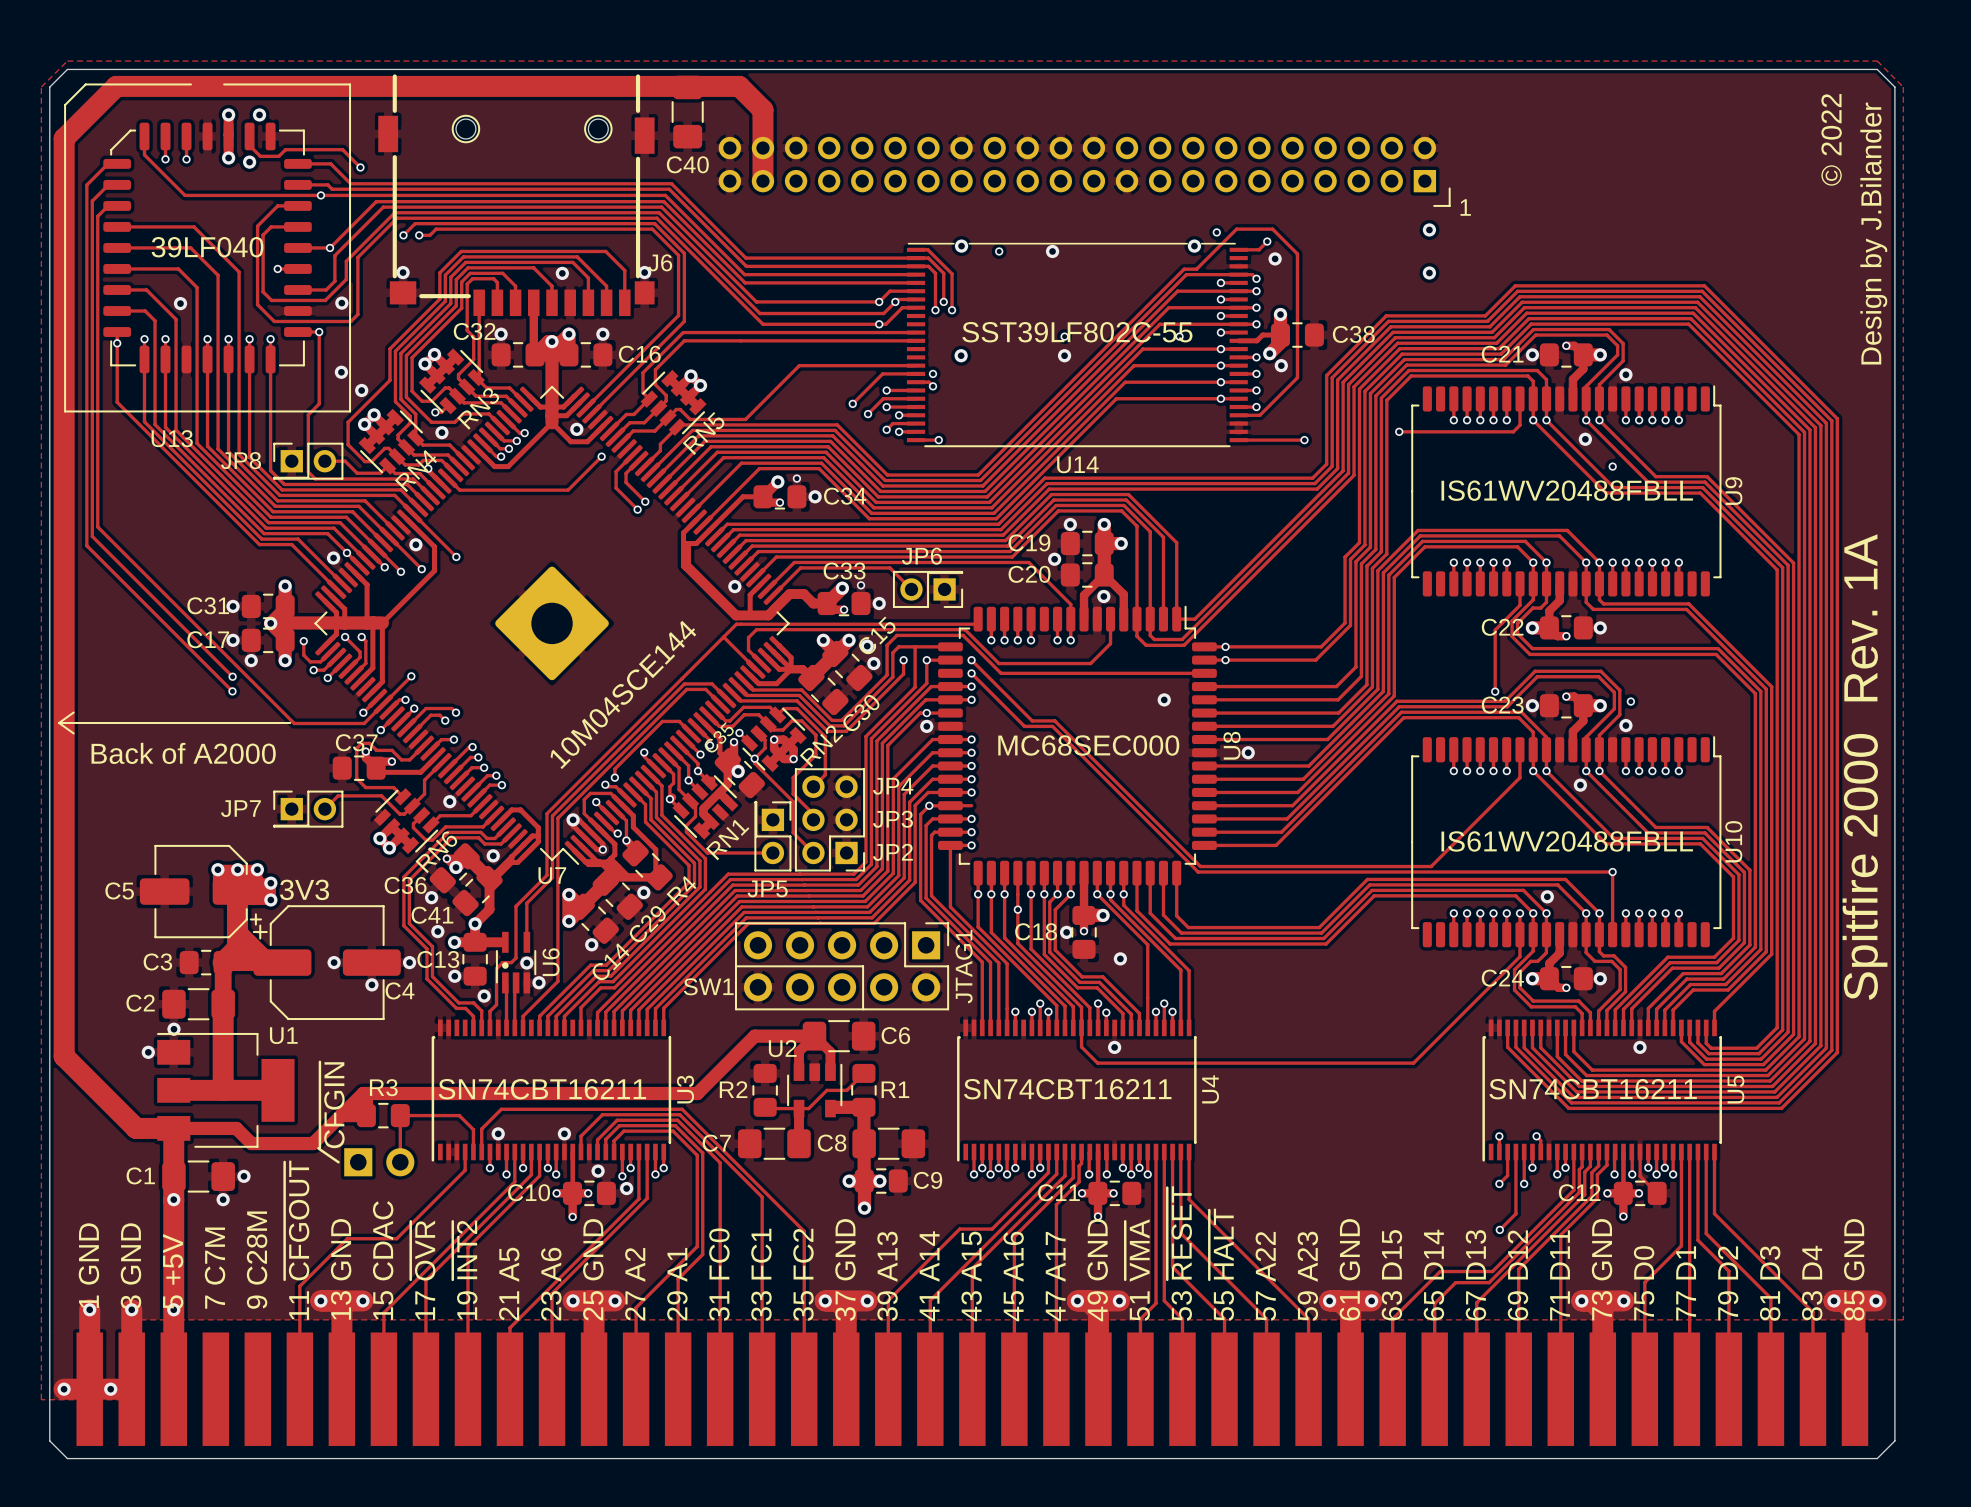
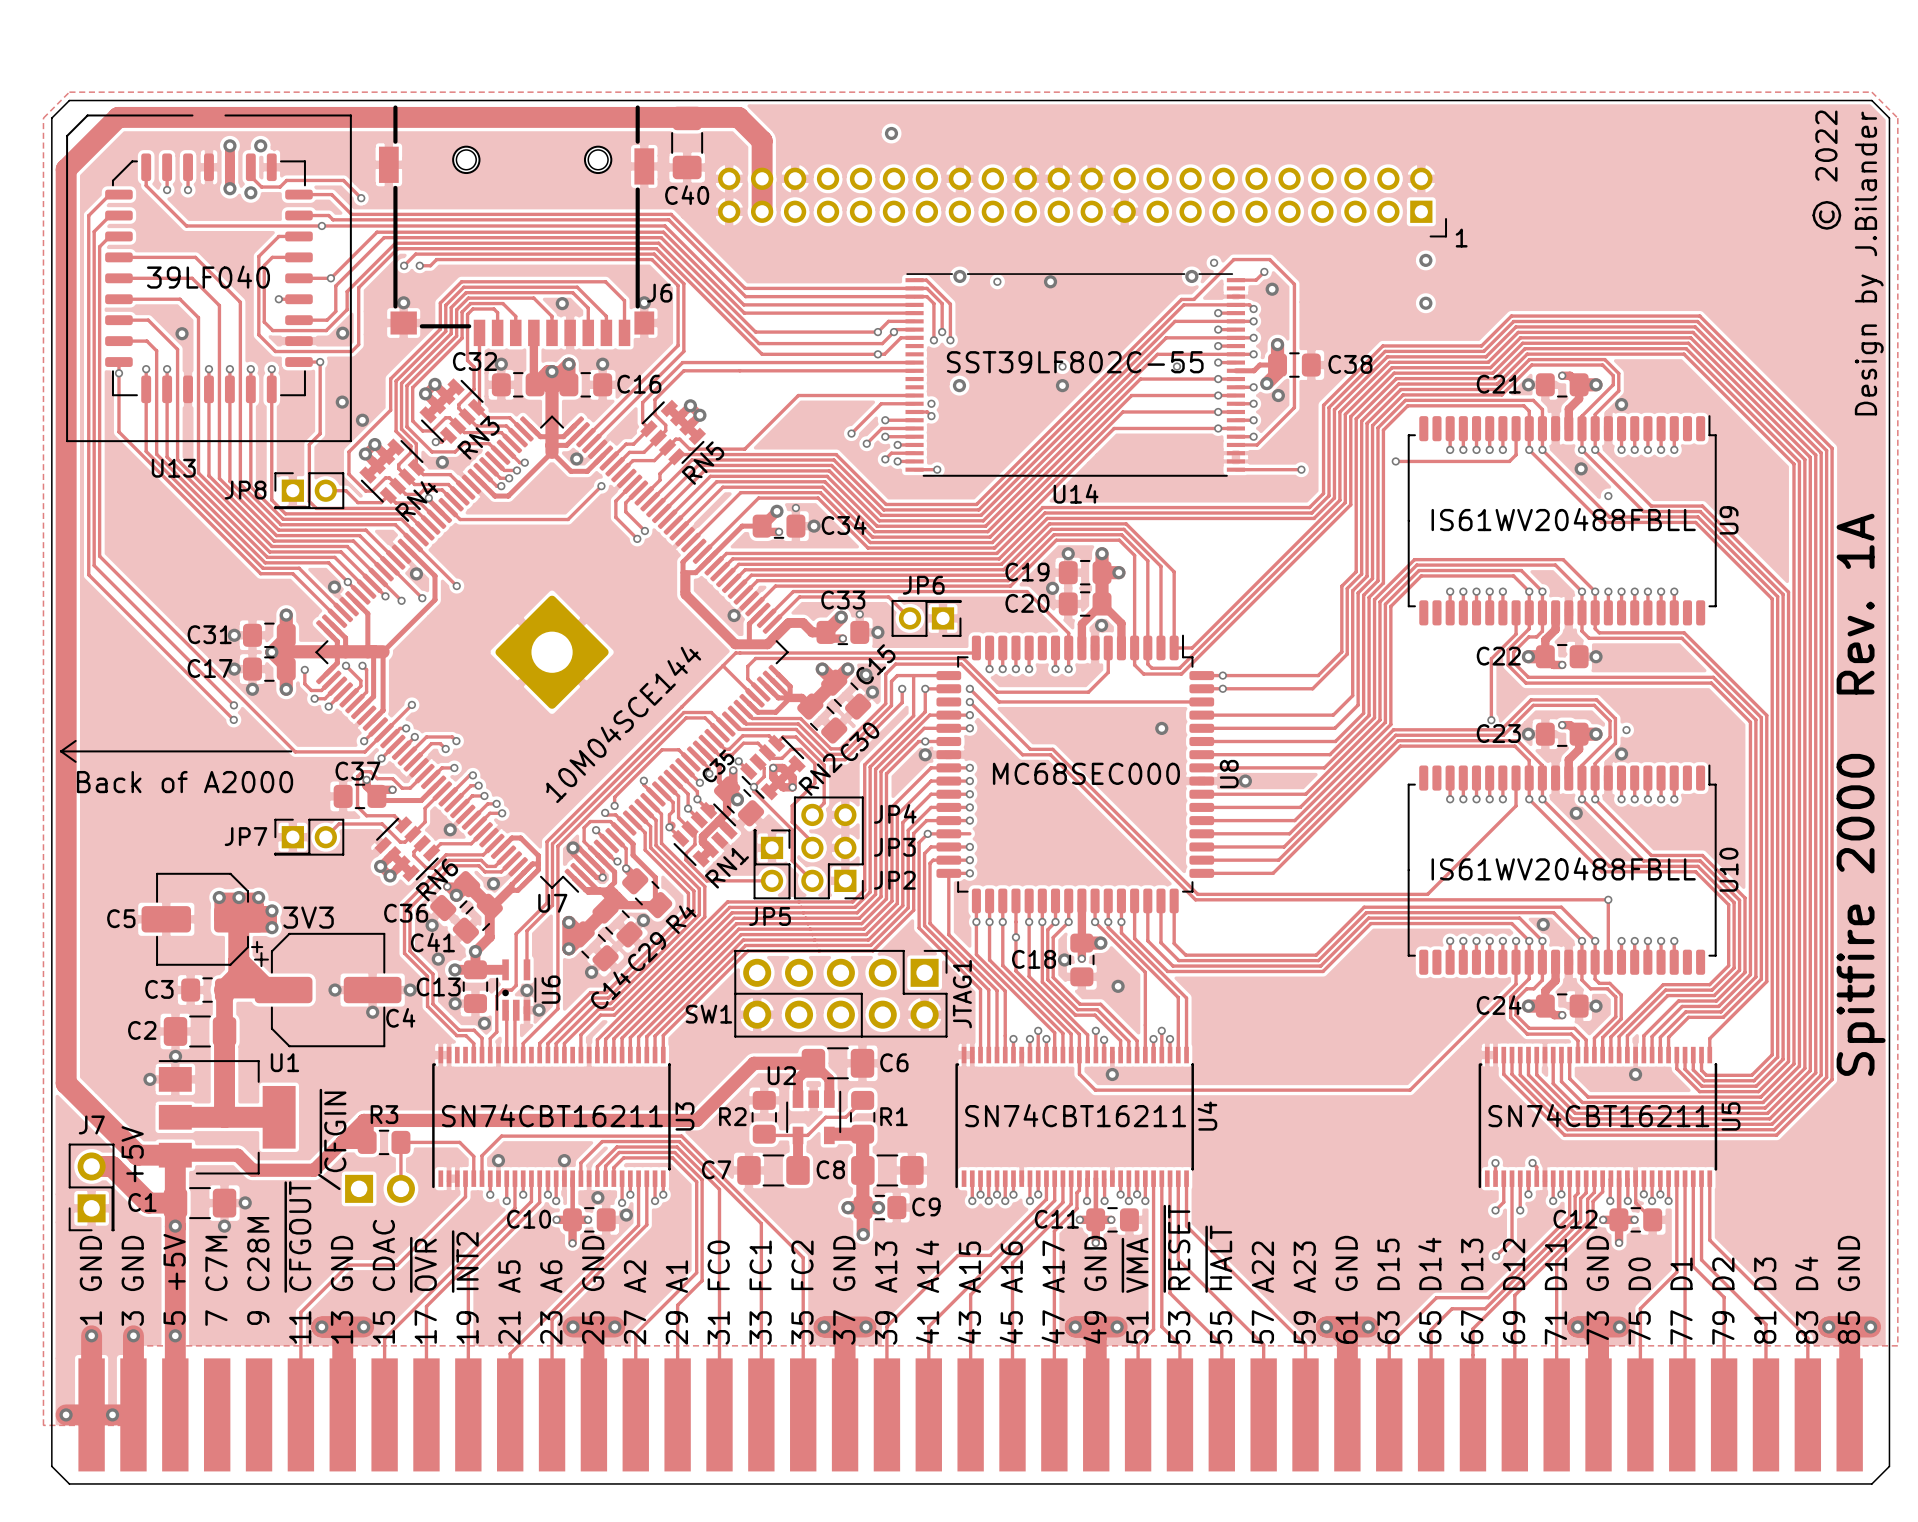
via: none -> (891, 133)
text: none -> +5V (132, 1154)
track: none -> (91, 1166) (112, 1166) (148, 1203) (175, 1203)
J7: none -> (91, 1187)

